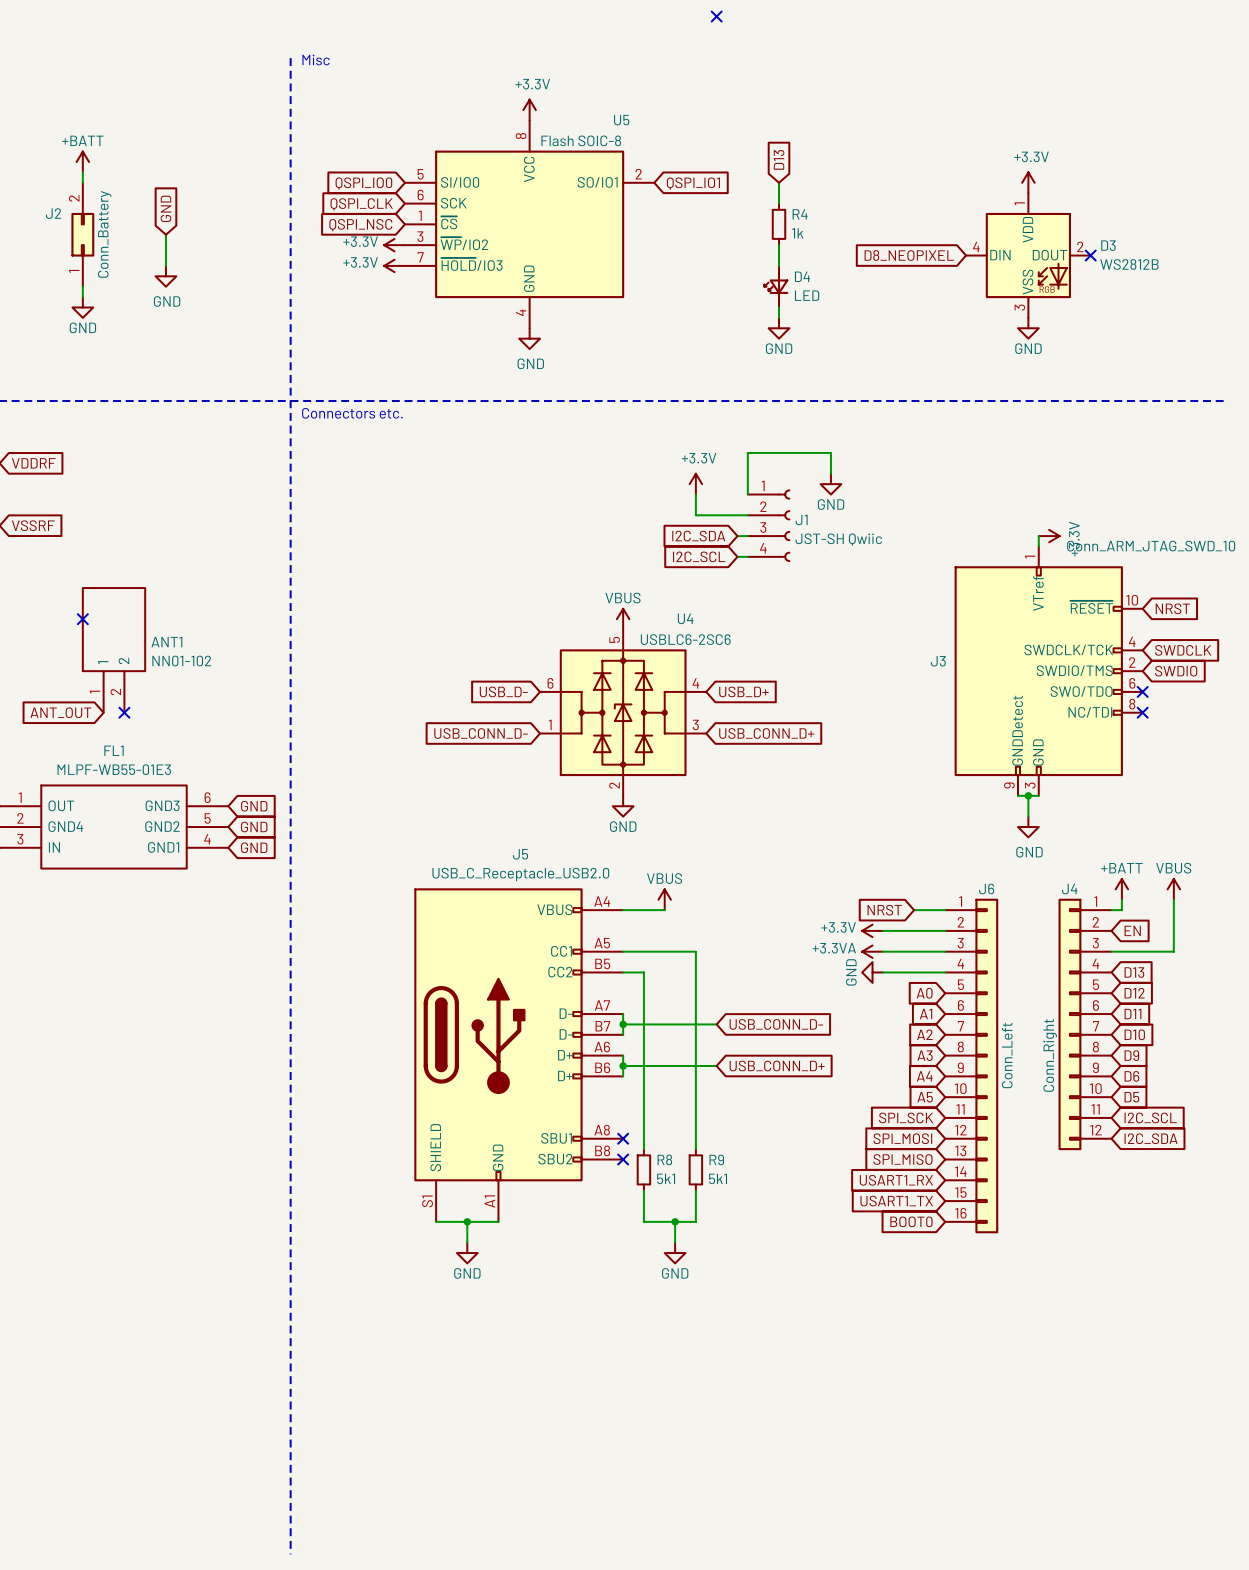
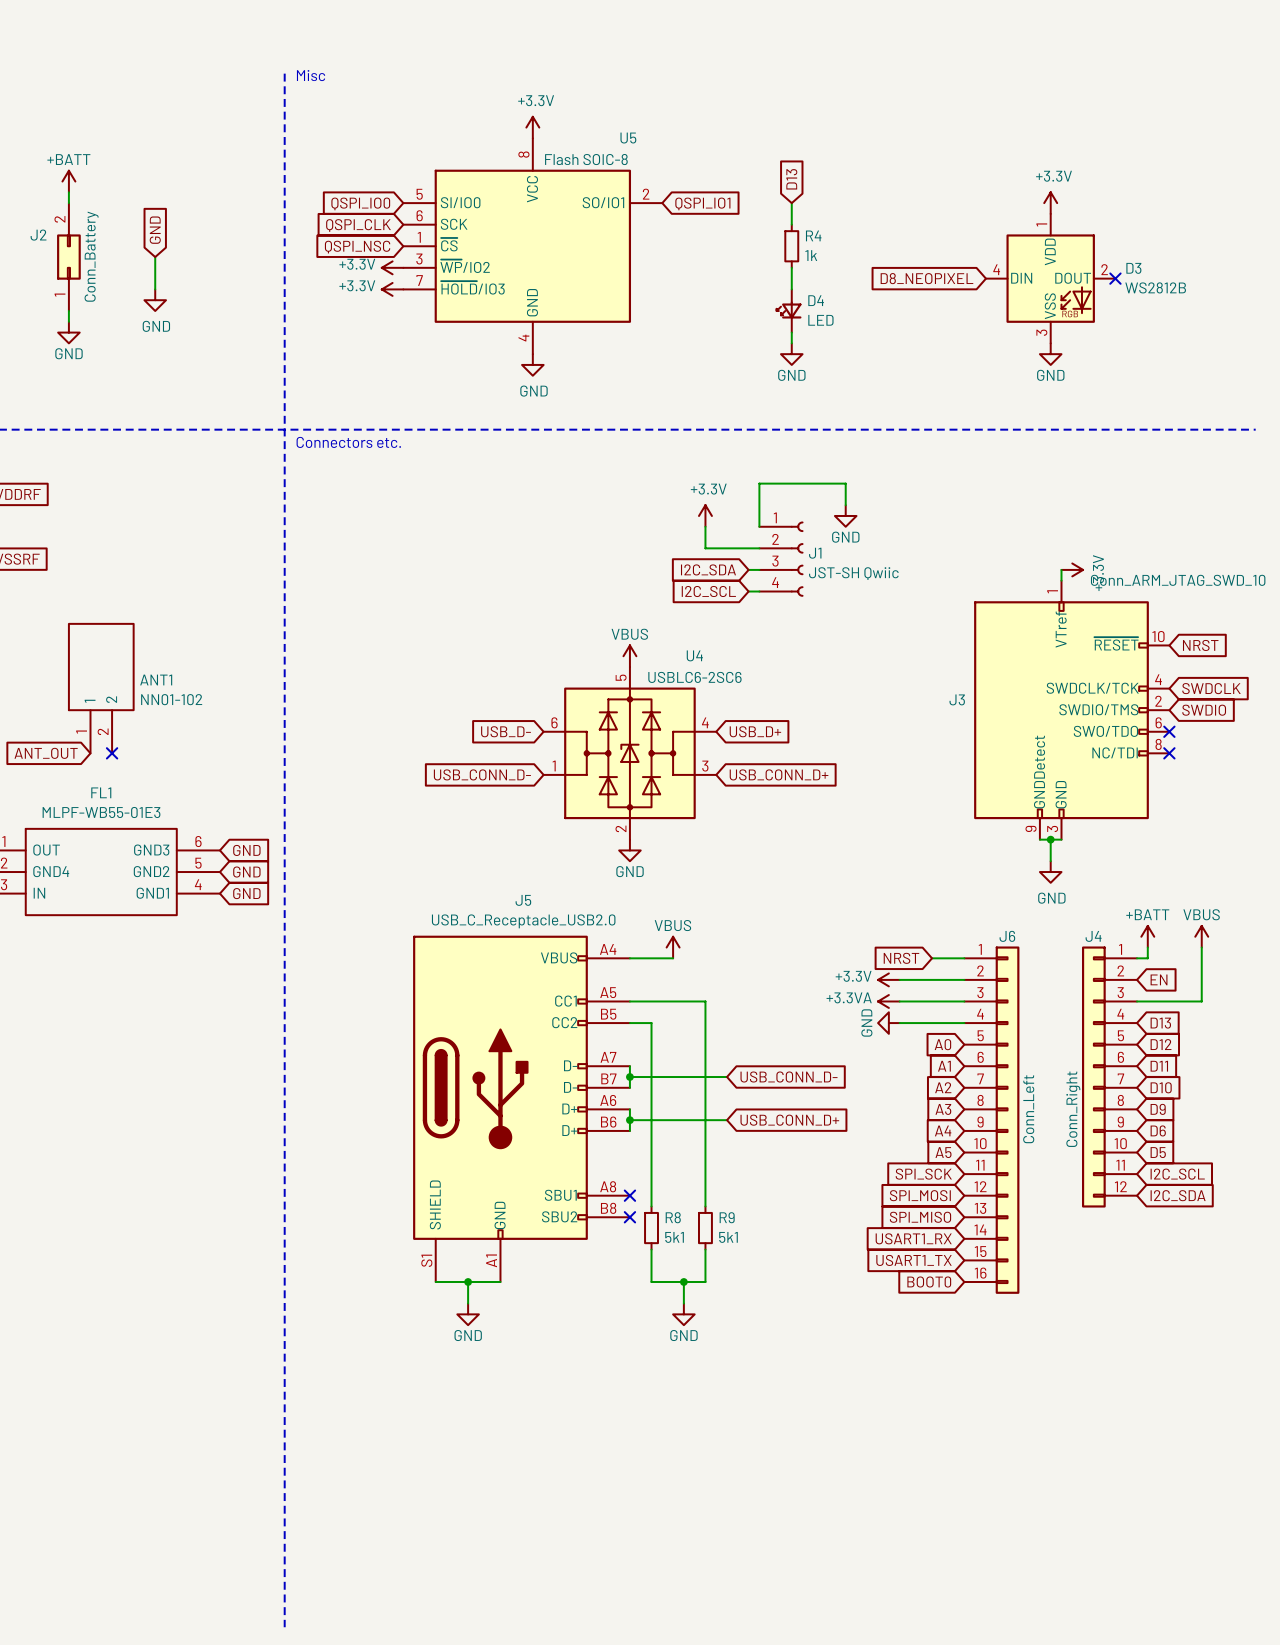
no-connect mark: (716, 16) -> none
no-connect mark: (82, 619) -> none

